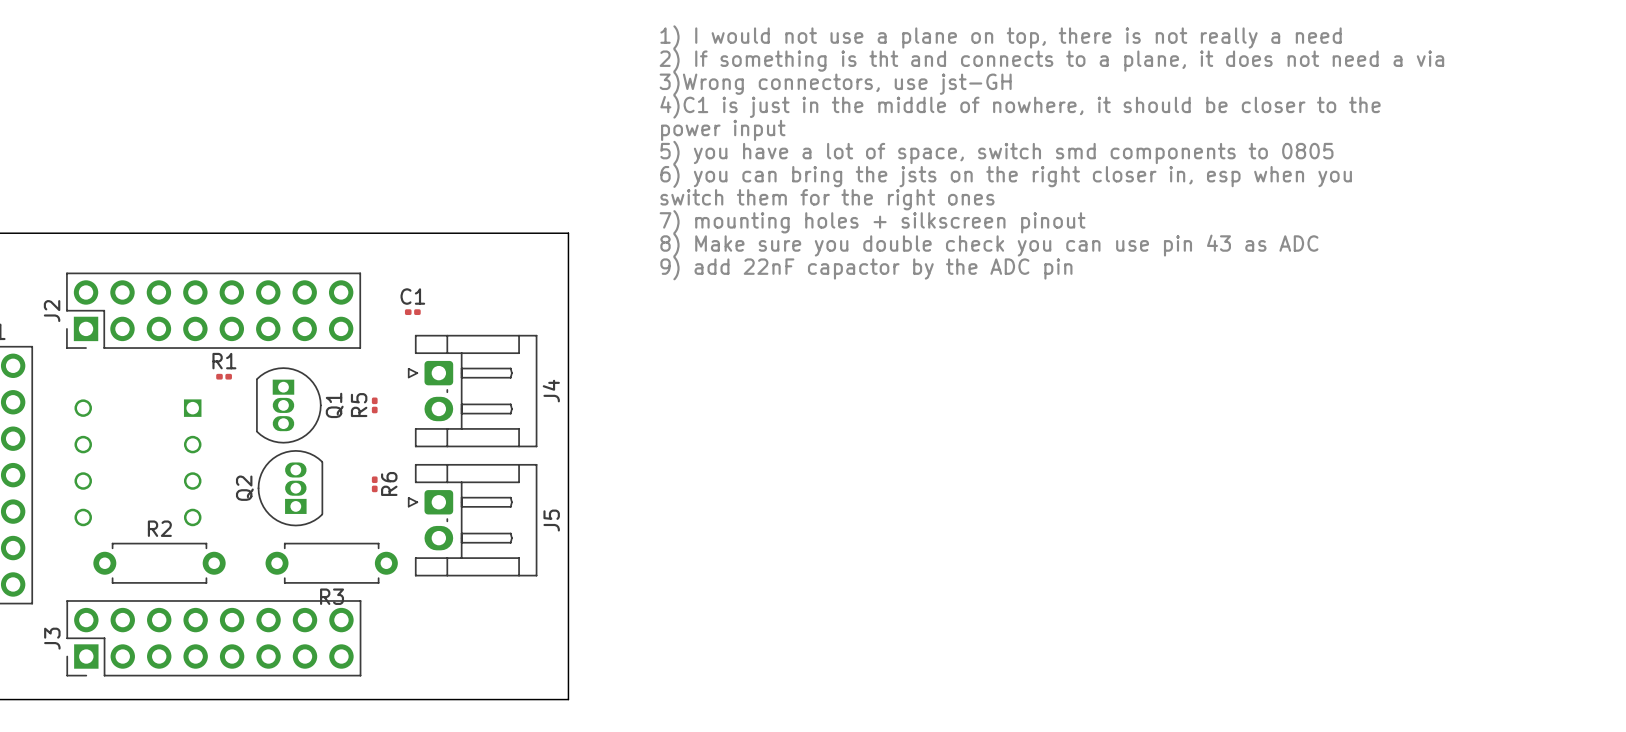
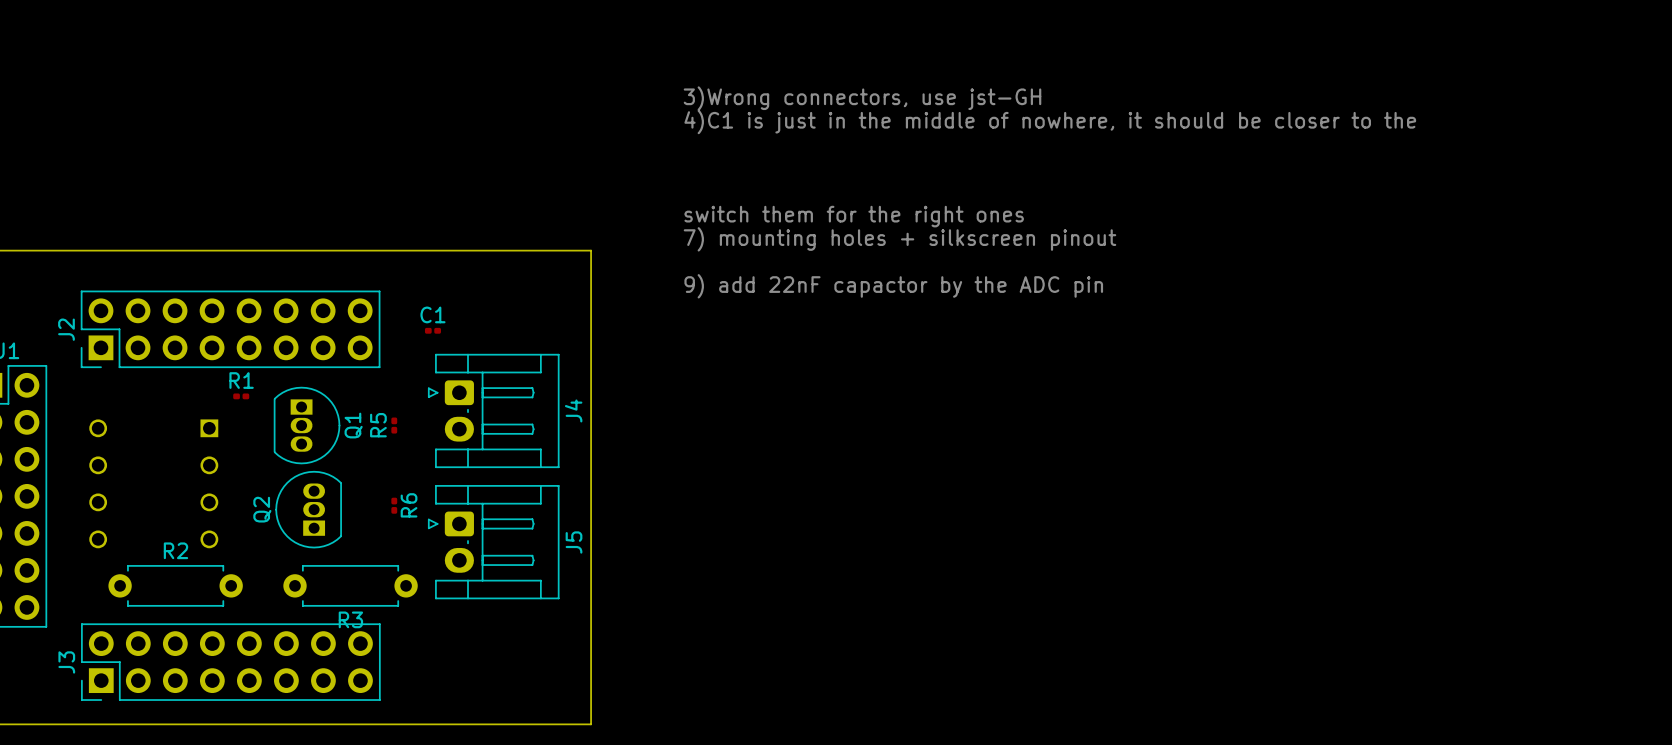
text: 1) I would not use a plane on top, there is not really a need (1001, 37) -> none
text: 2) If something is tht and connects to a plane, it does not need a via (1051, 60) -> none
text: power input (723, 130) -> none
text: 5) you have a lot of space, switch smd components to 0805 (996, 152) -> none
text: 6) you can bring the jsts on the right closer in, esp when you (1006, 175) -> none
text: 8) Make sure you double check you can use pin 43 as ADC (989, 245) -> none

